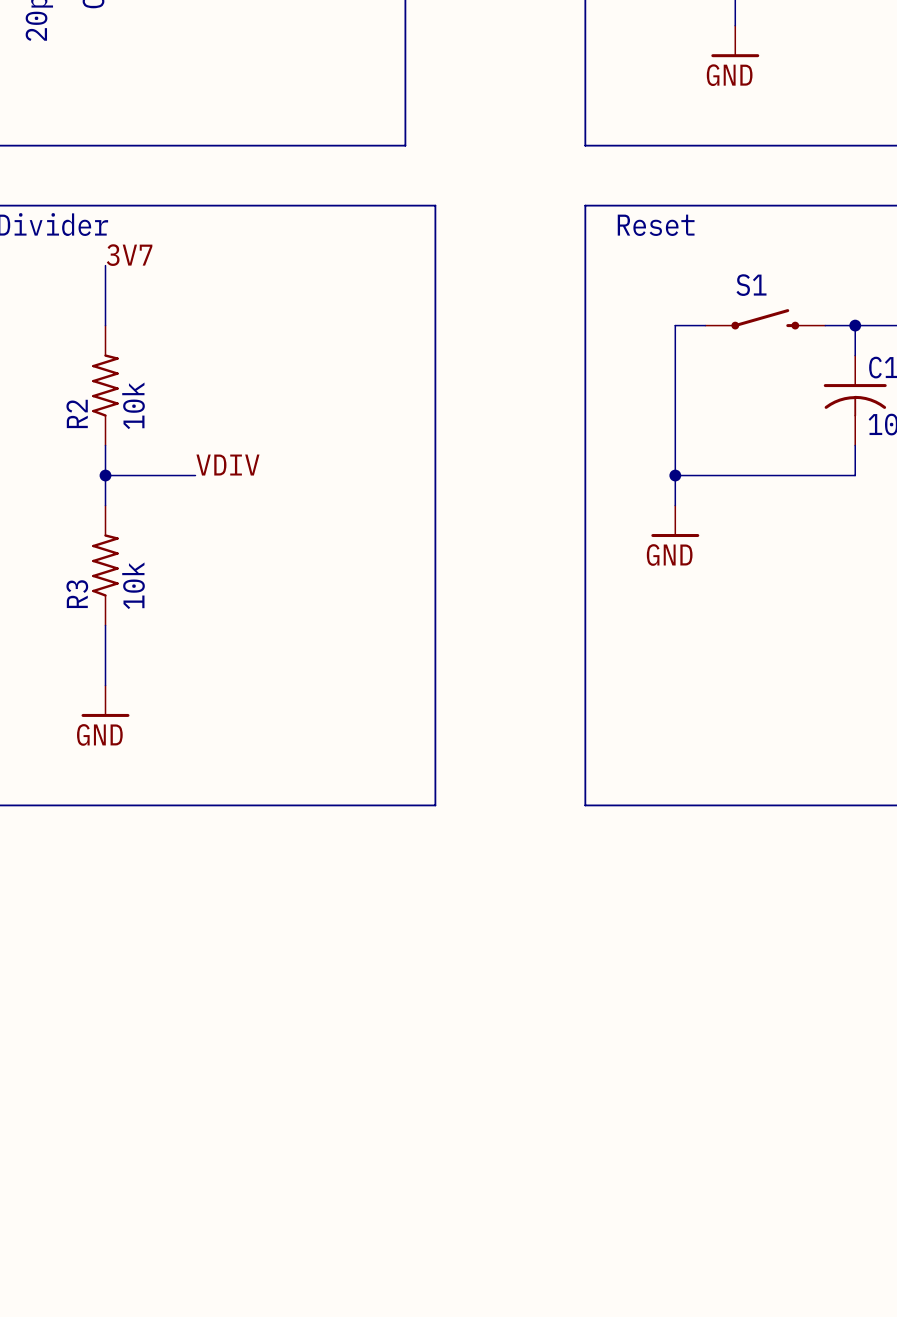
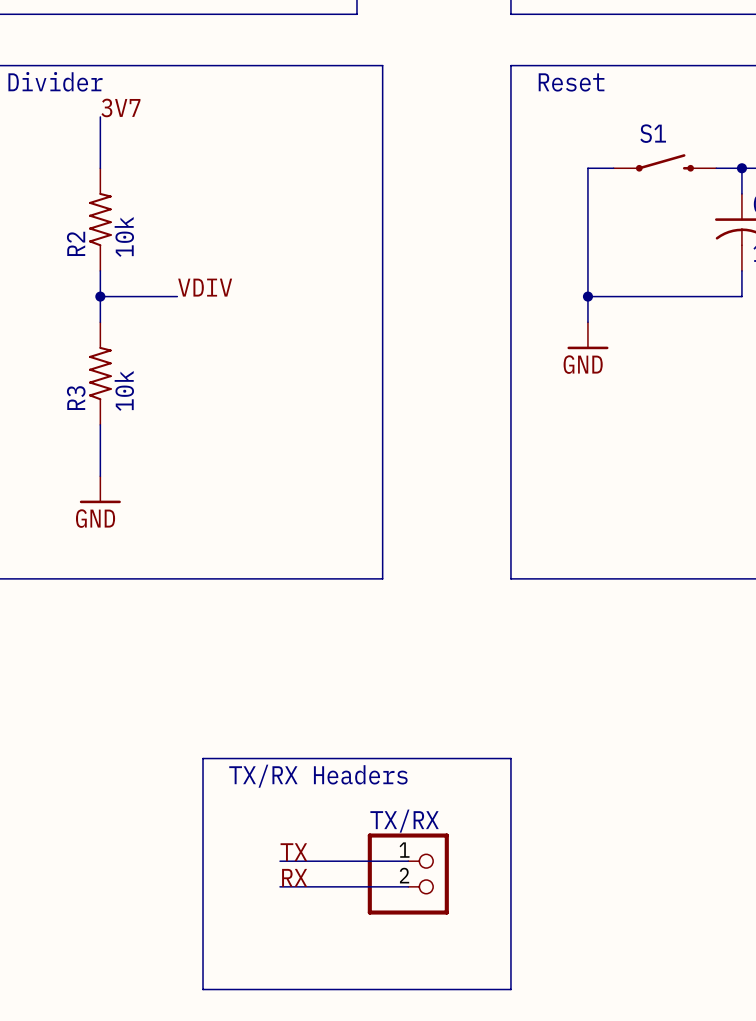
line: none -> (203, 758) (203, 989) (510, 989) (510, 758) (203, 758)
text: none -> TX/RX Headers (318, 776)
label: none -> TX (293, 852)
wire: none -> (280, 861) (408, 861)
TX/RX: none -> (408, 874)
label: none -> RX (294, 877)
wire: none -> (280, 886) (408, 886)

